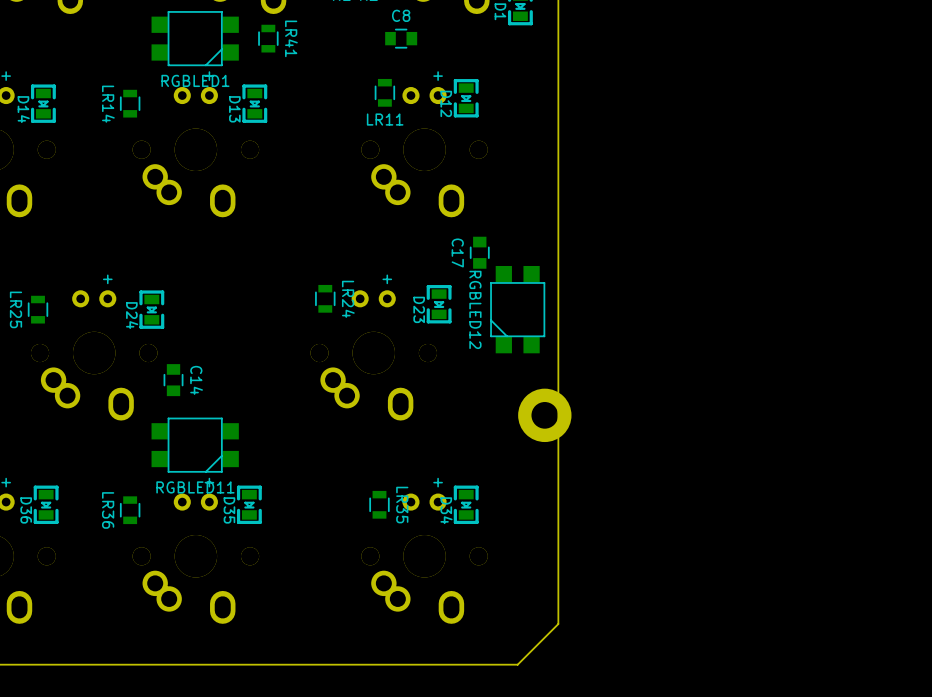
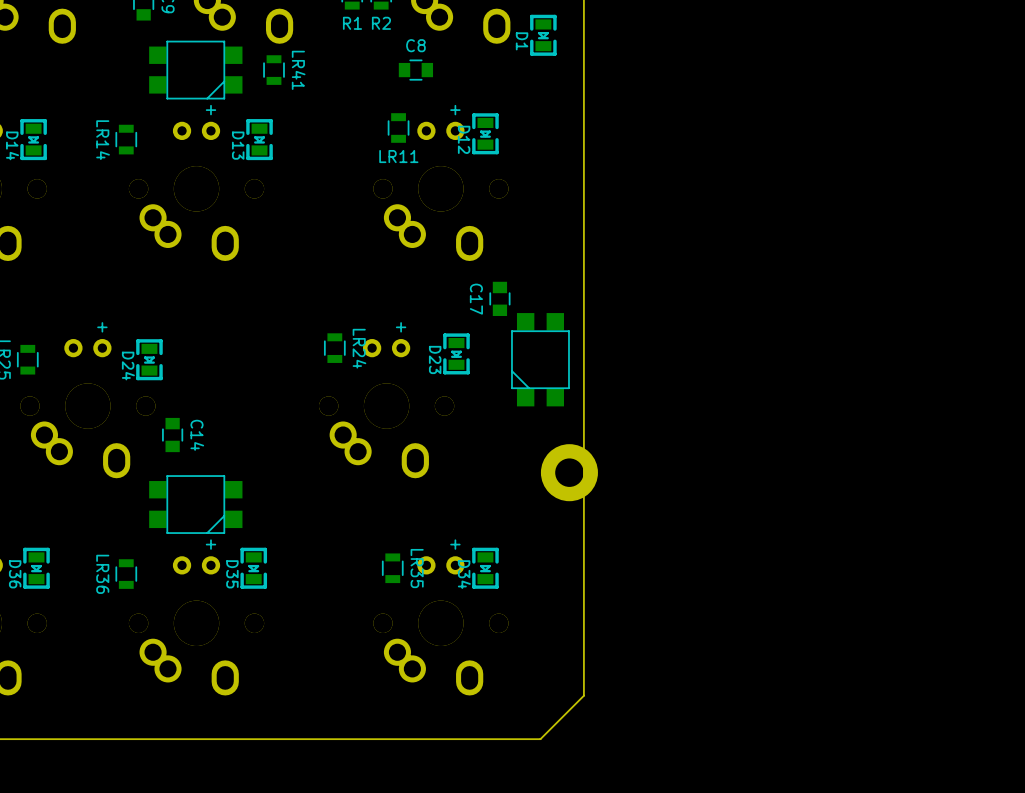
RGBLED1 name: RGBLED1 (195, 80) -> none
RGBLED12 name: RGBLED12 (475, 309) -> none
RGBLED11 name: RGBLED11 (195, 487) -> none

